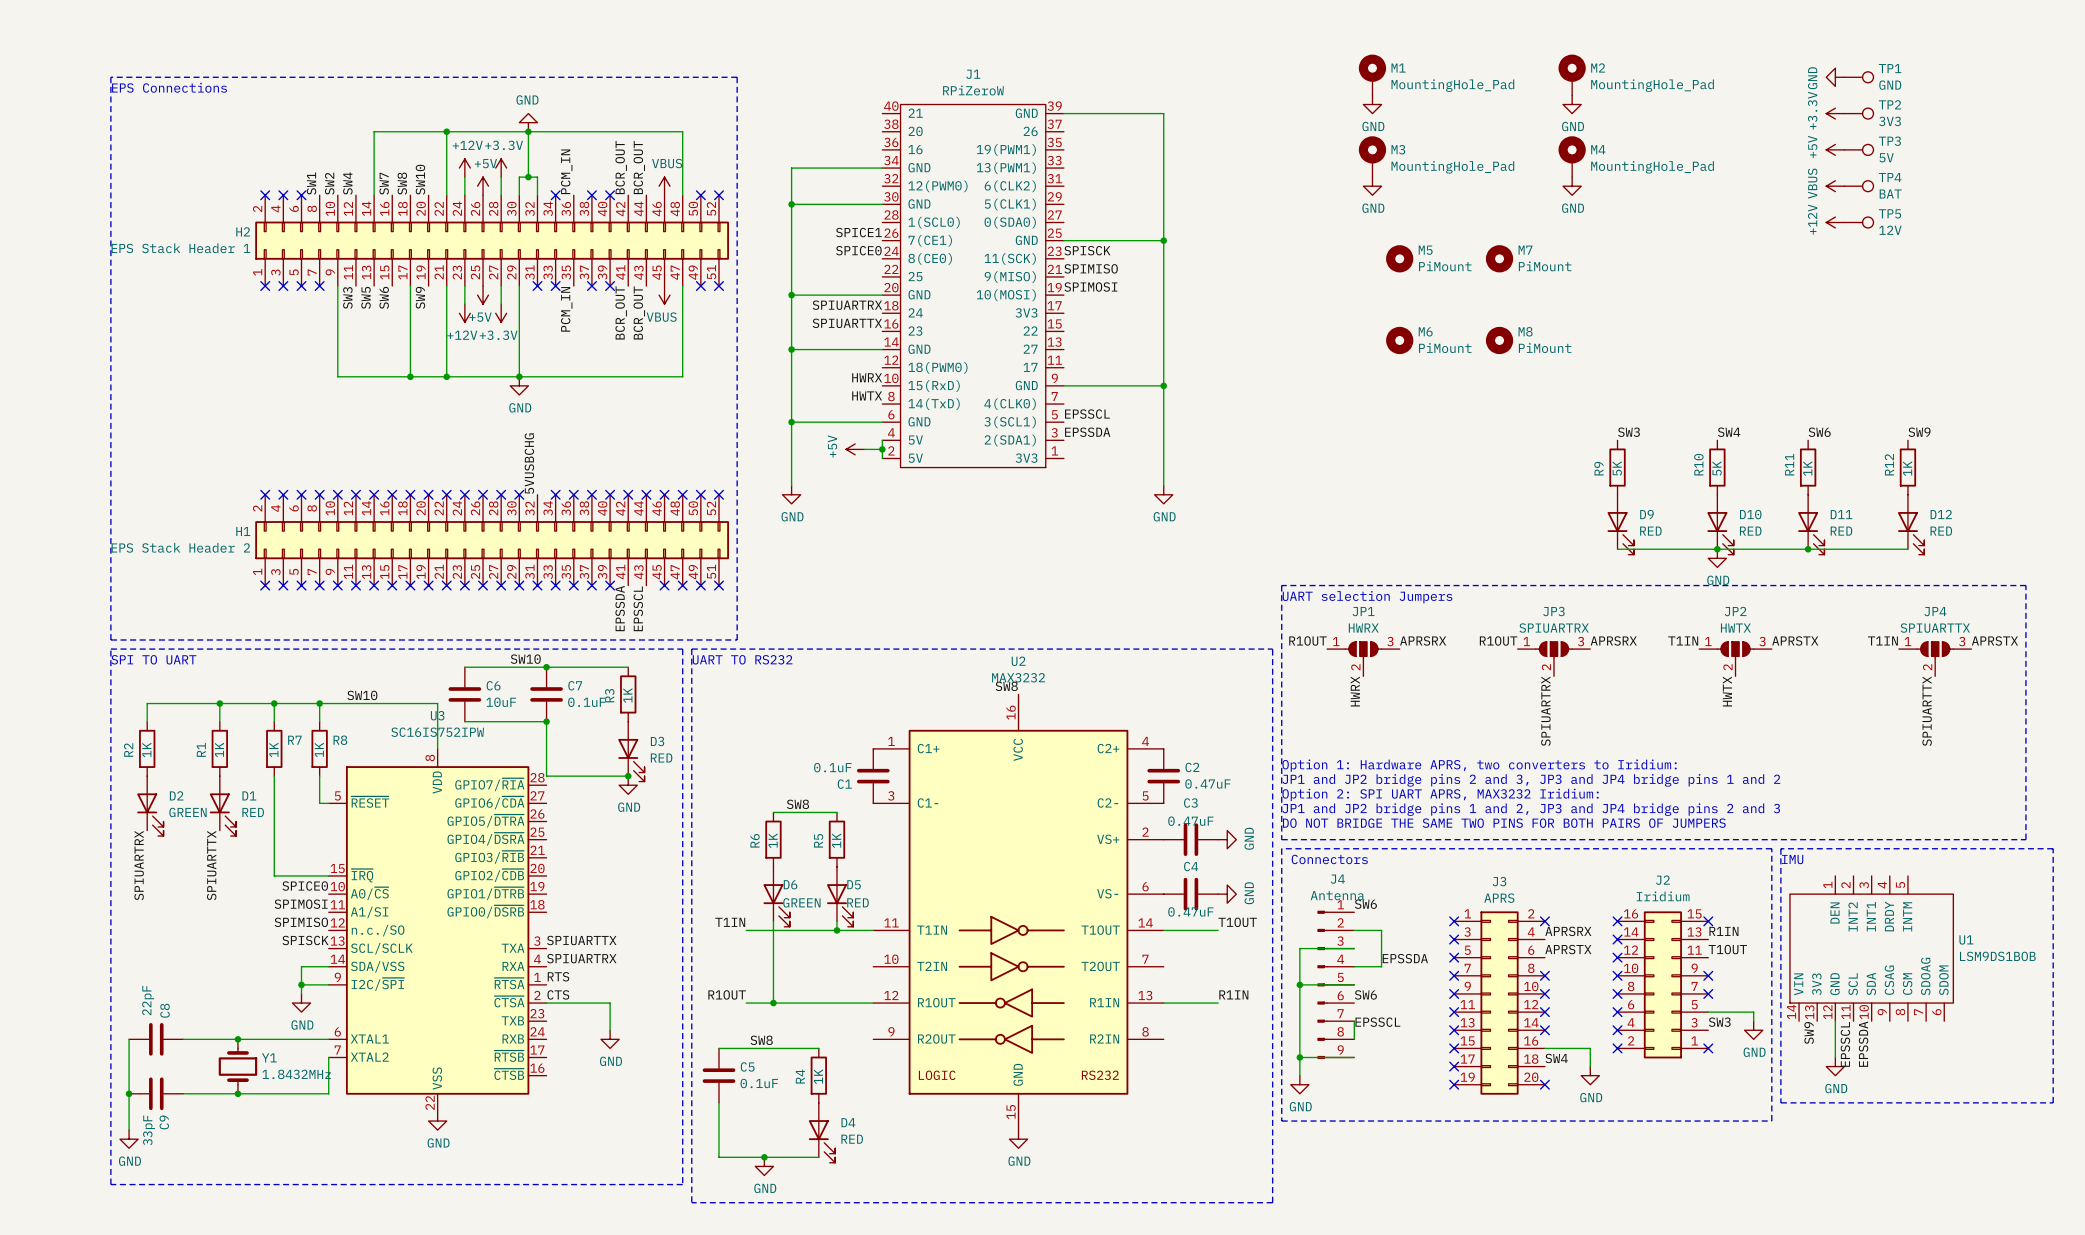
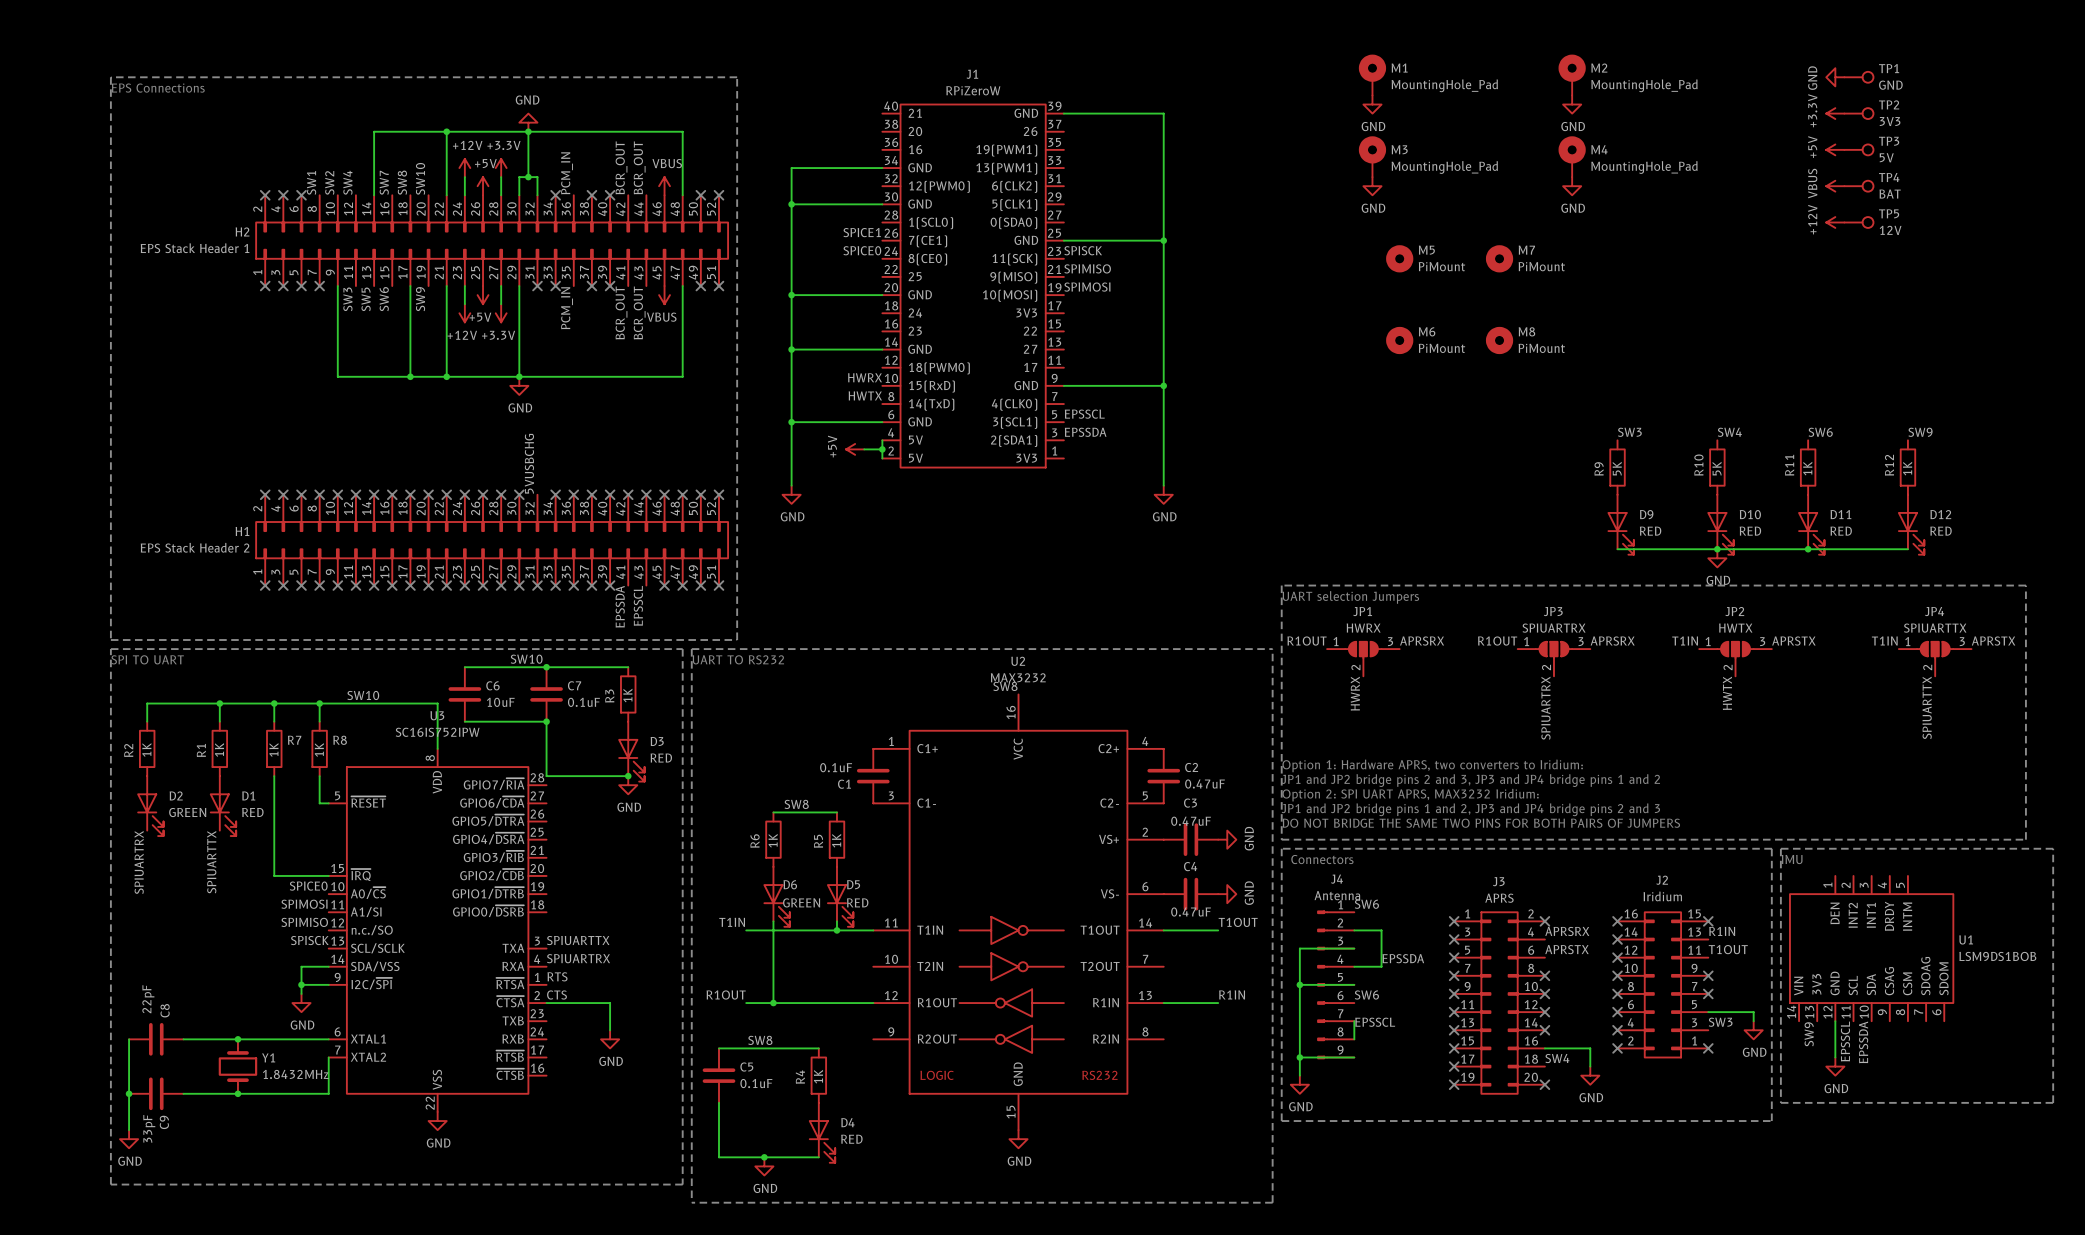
label: SPIUARTRX (847, 305) -> none
label: SPIUARTTX (847, 323) -> none

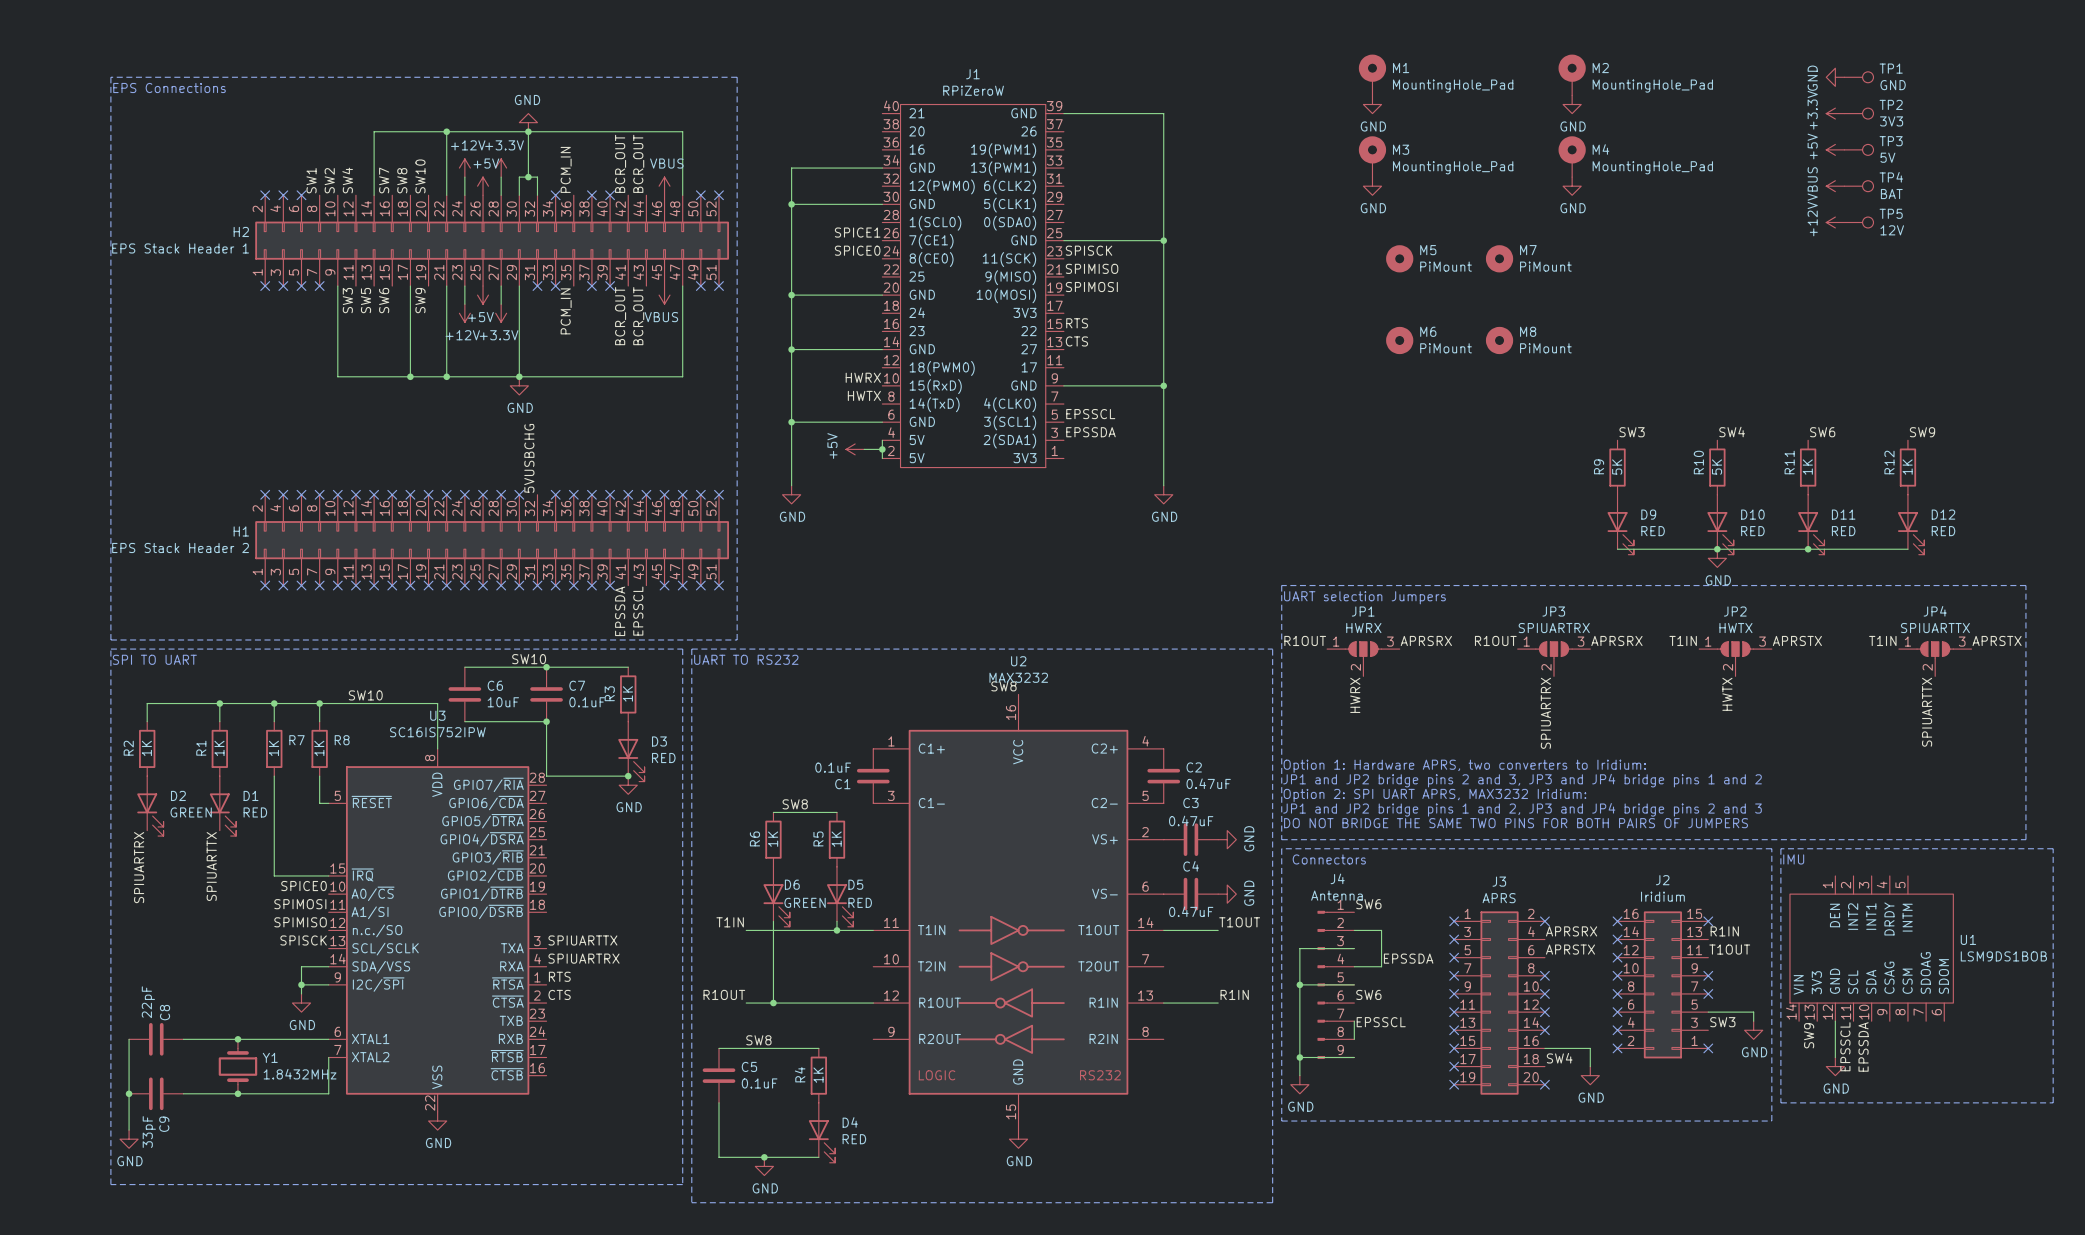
label: none -> RTS (1077, 323)
label: none -> CTS (1076, 341)
wire: (546, 1003) (610, 1003) (610, 1030) -> none
power symbol: GND (610, 1039) -> none

